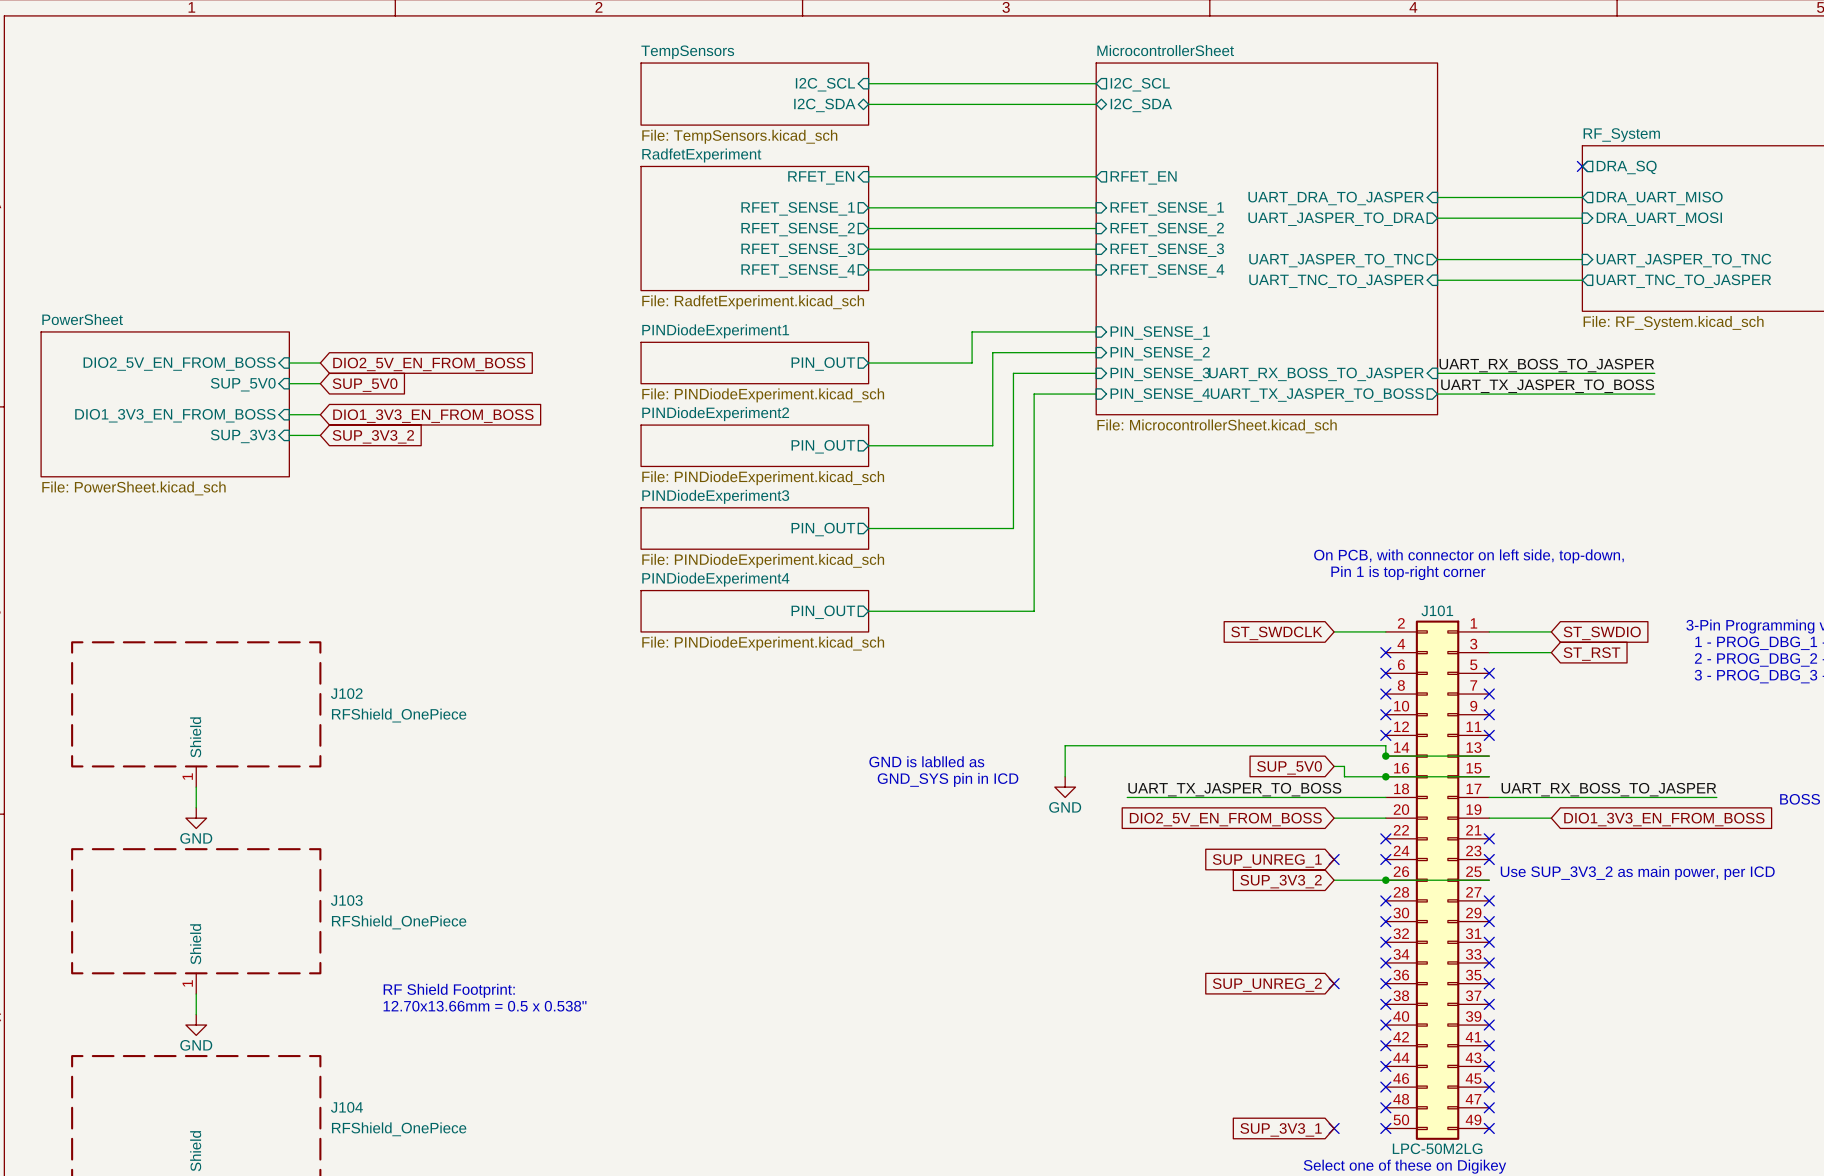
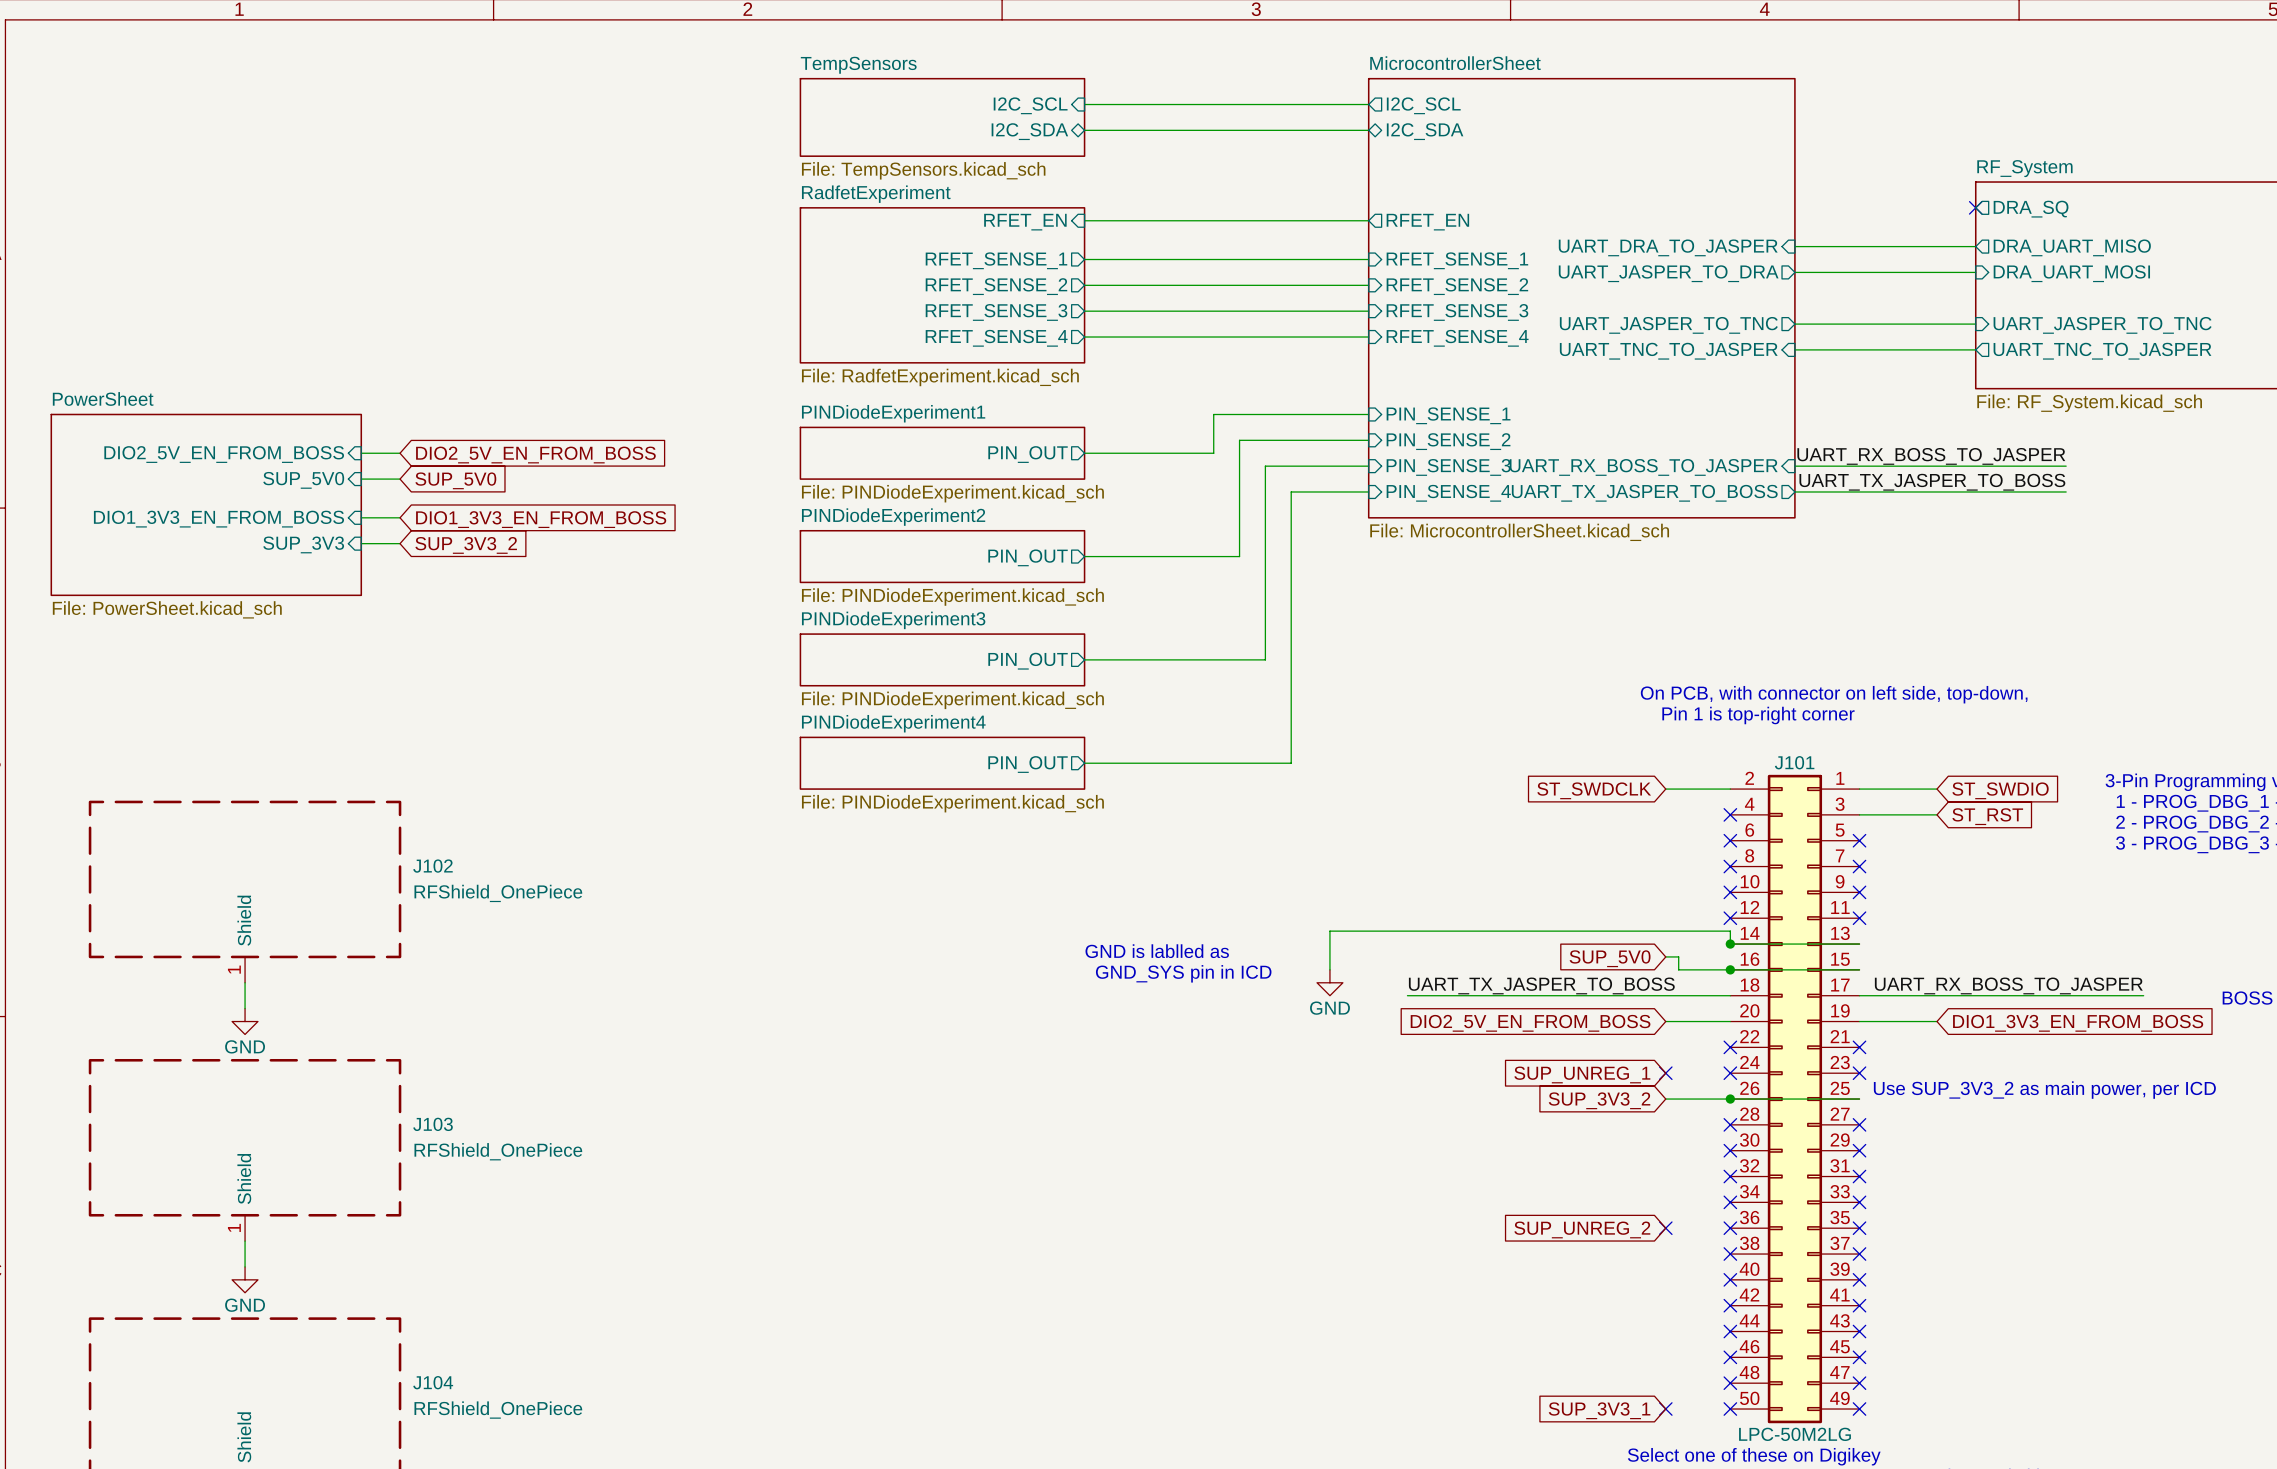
text: RF Shield Footprint: (449, 990) -> none
text: 12.70x13.66mm = 0.5 x 0.538" (485, 1006) -> none

